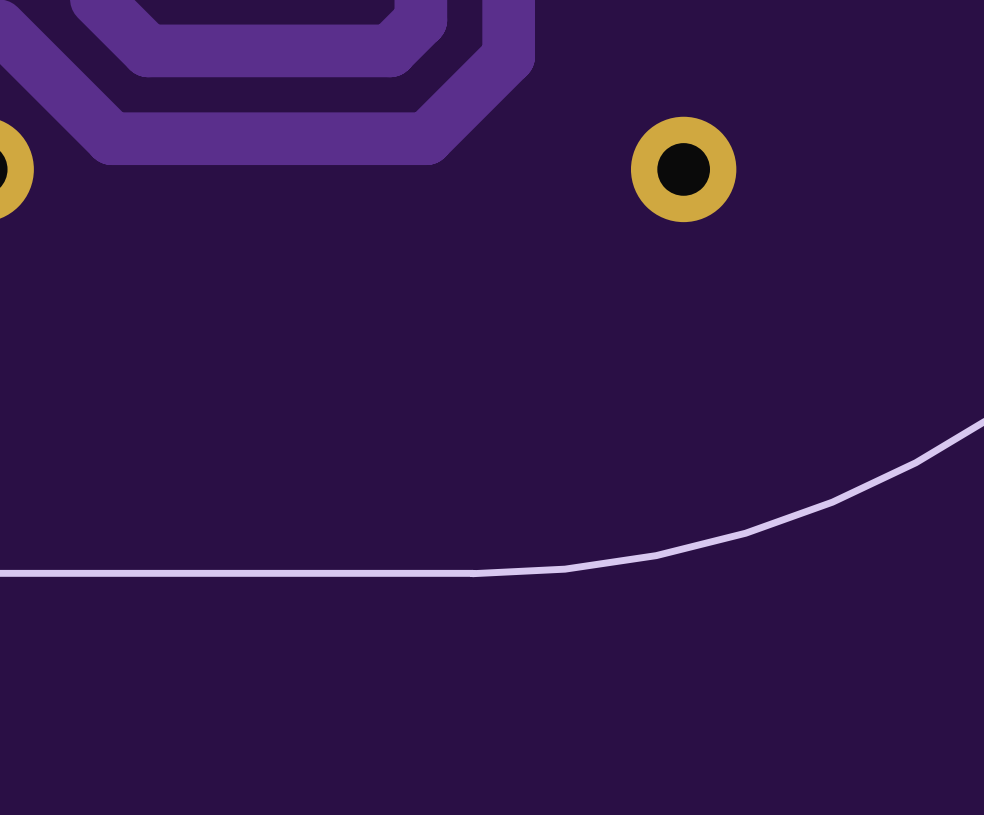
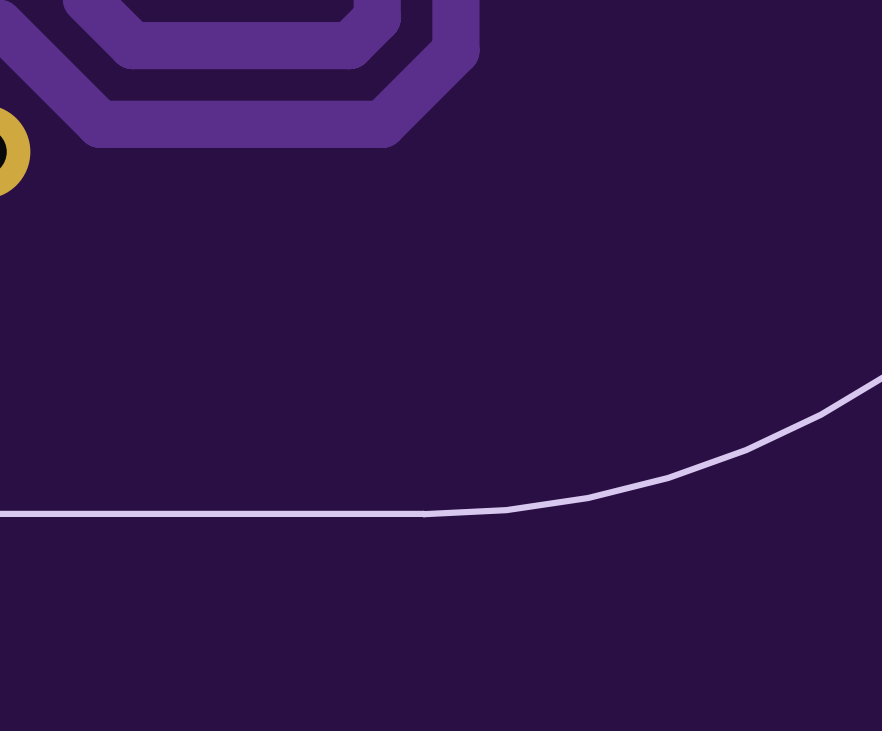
via: (683, 169) -> none

